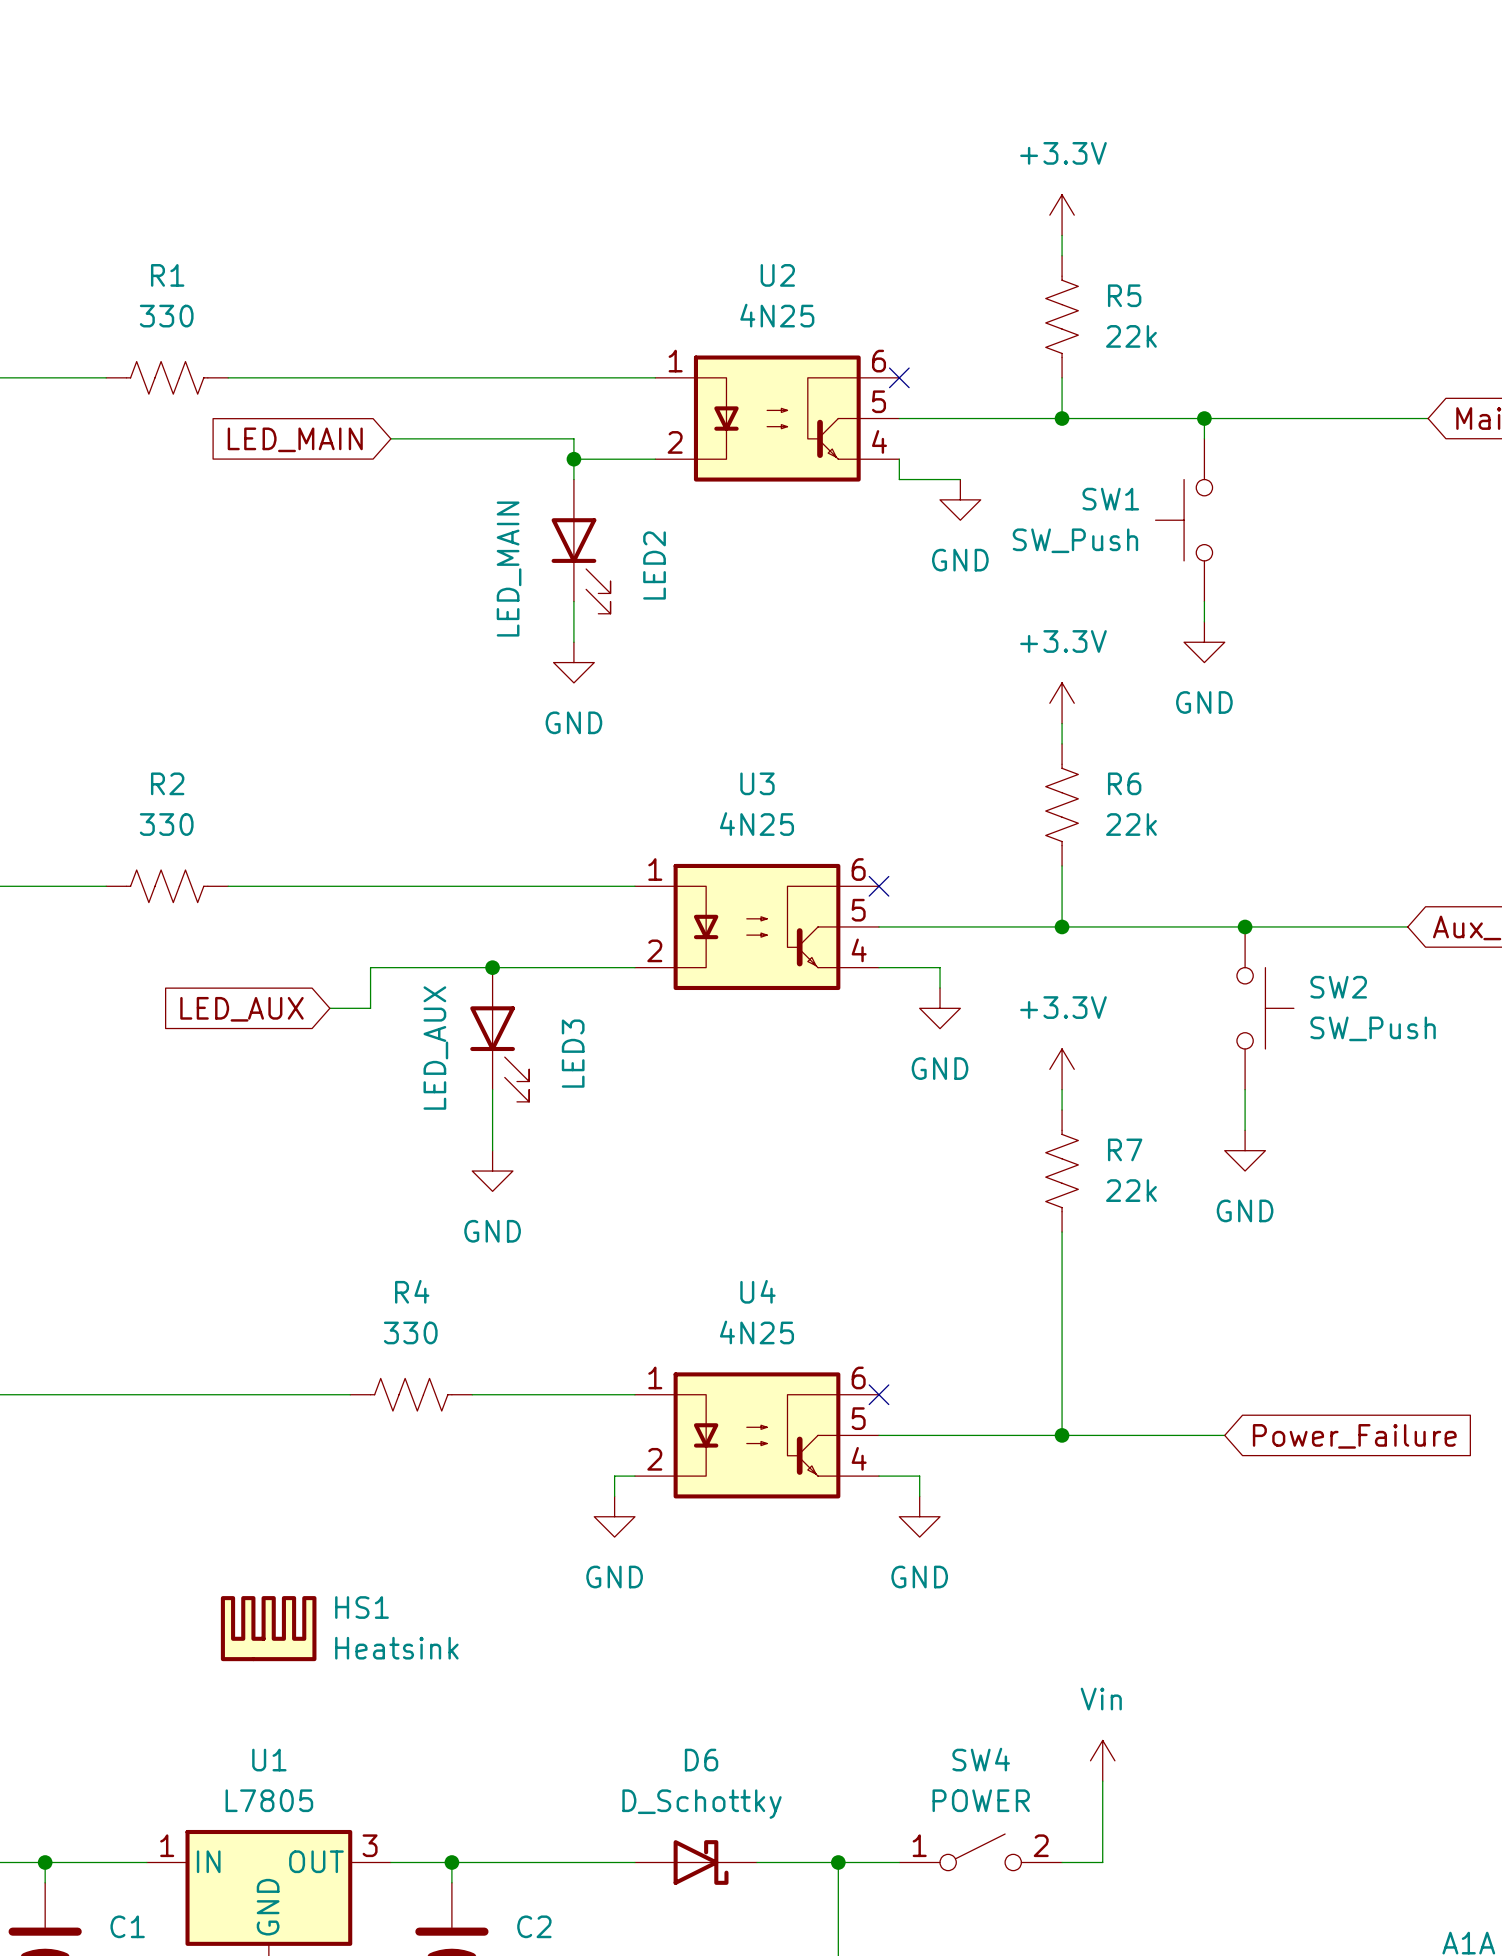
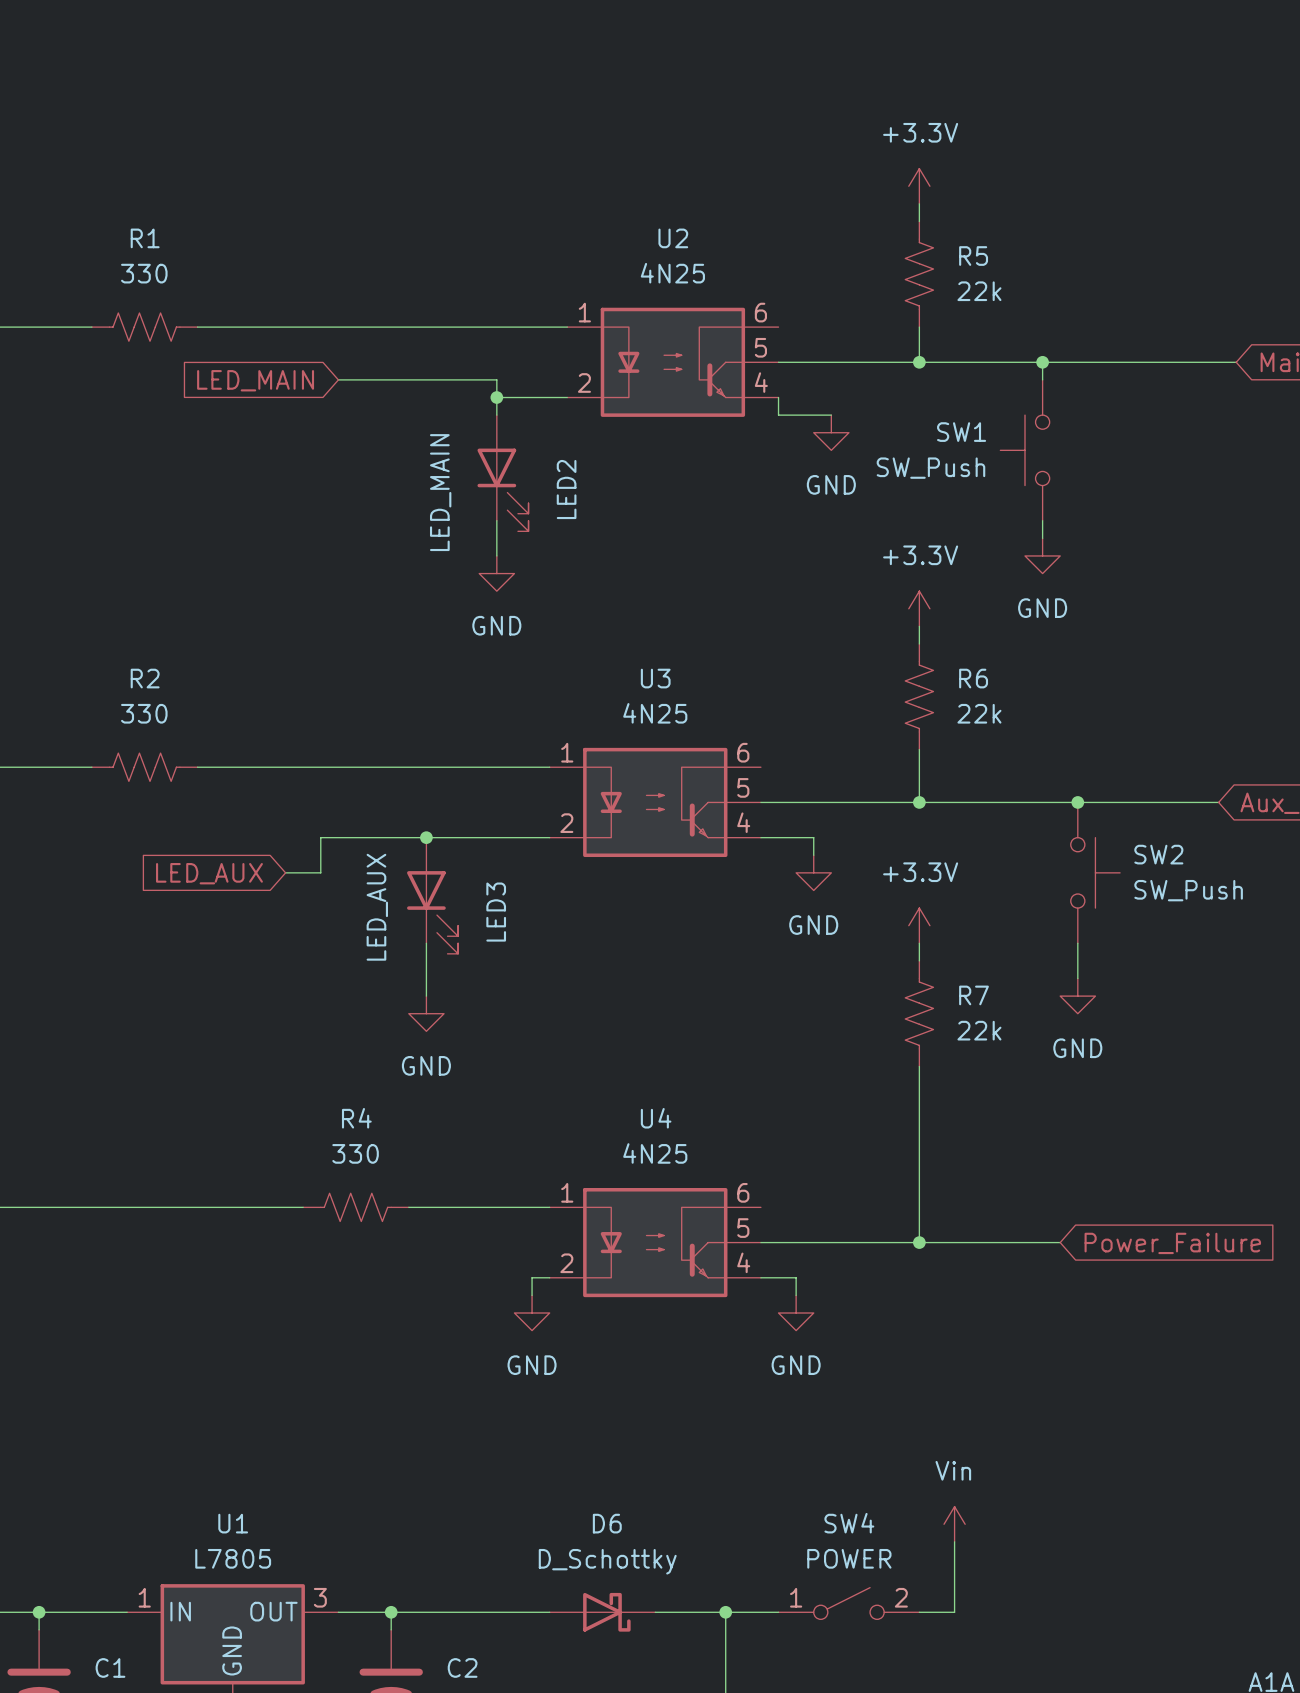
no-connect mark: (899, 377) -> none
no-connect mark: (879, 886) -> none
no-connect mark: (879, 1394) -> none
HS1: Heatsink (268, 1628) -> none

